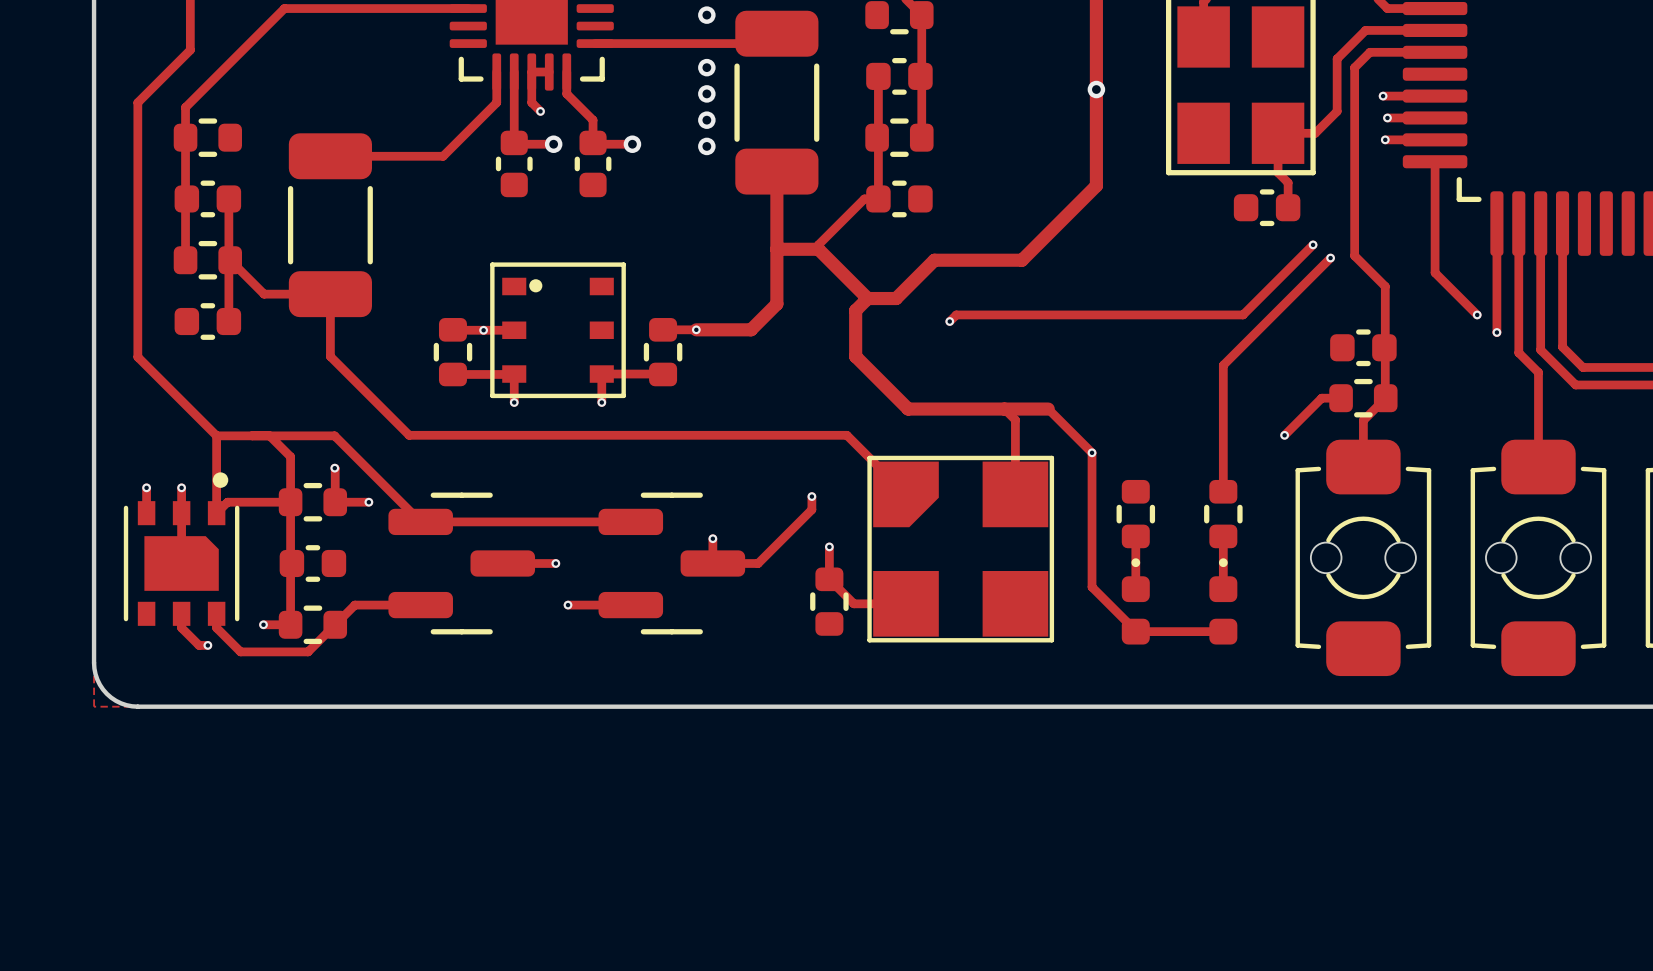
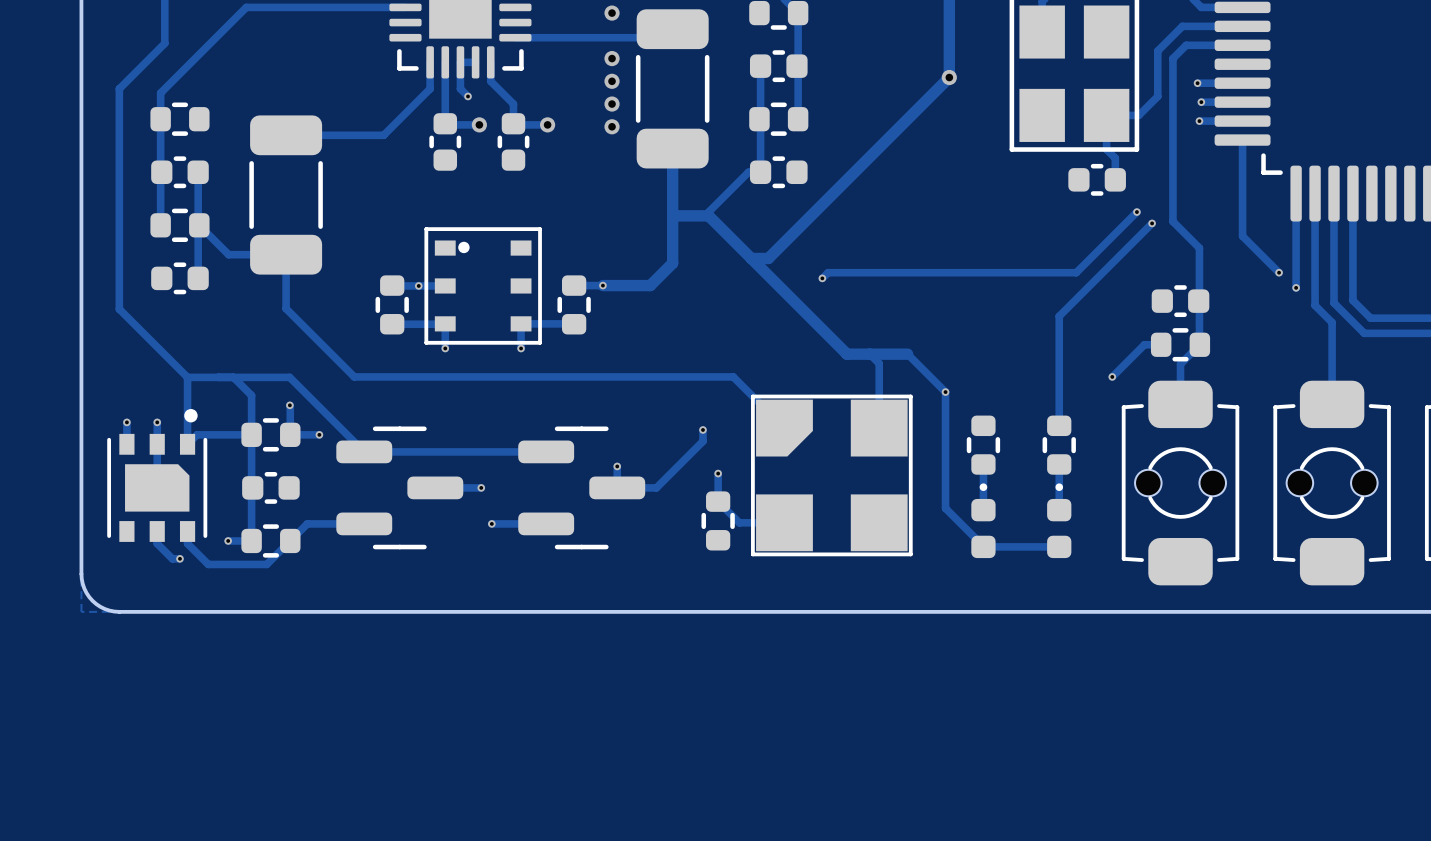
track: (1096, 89) (1096, 185) (1021, 260) (934, 260) (896, 298) (887, 298) -> (949, 77) (768, 258)
track: (867, 298) (855, 310) (855, 356) (908, 409) (978, 409) -> (751, 258) (847, 354)

